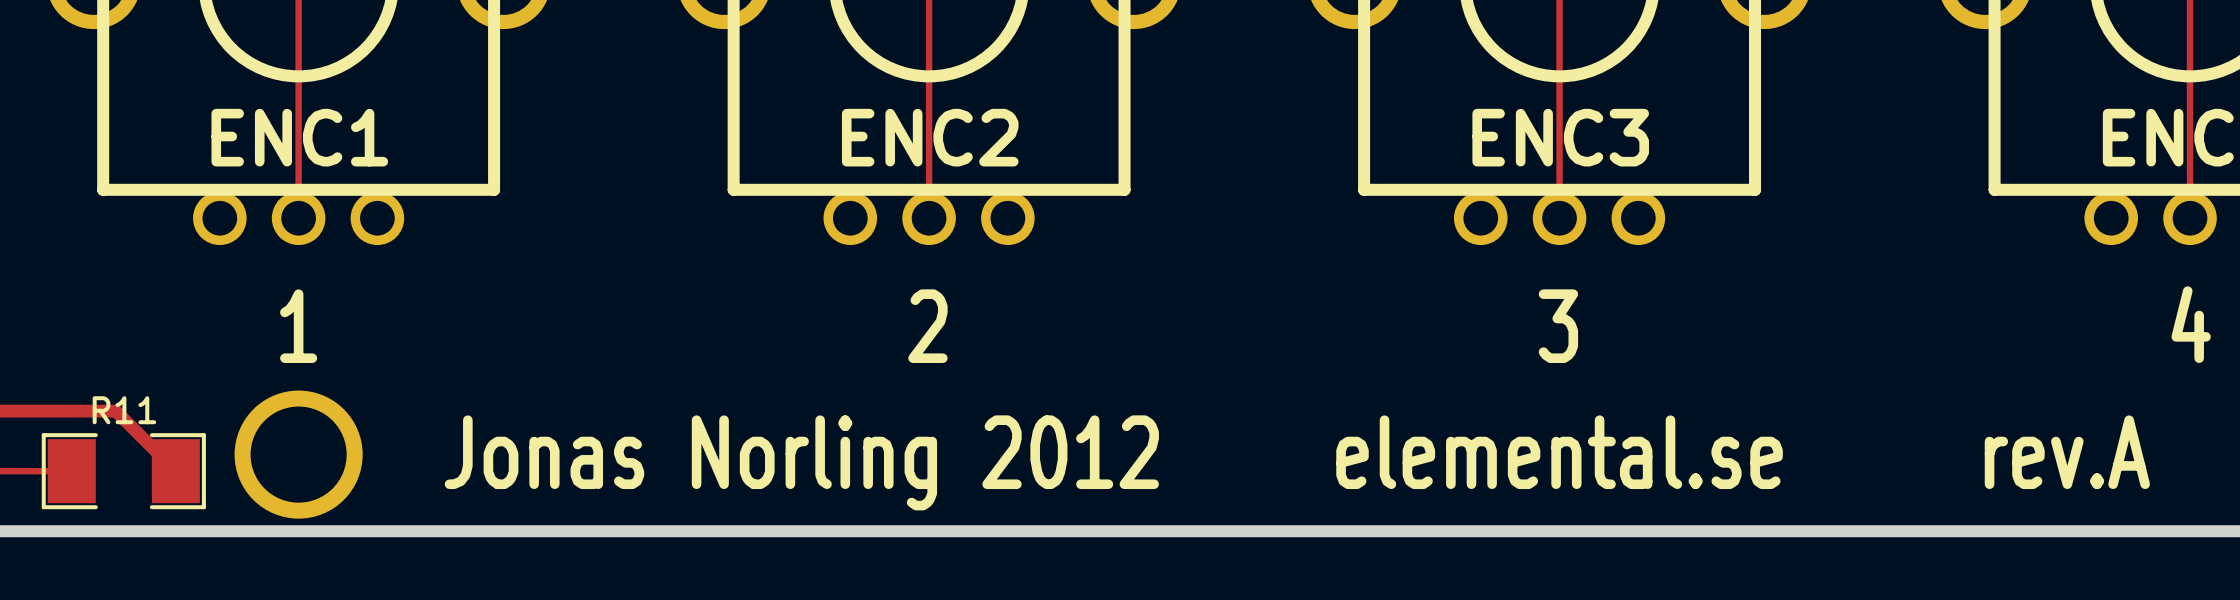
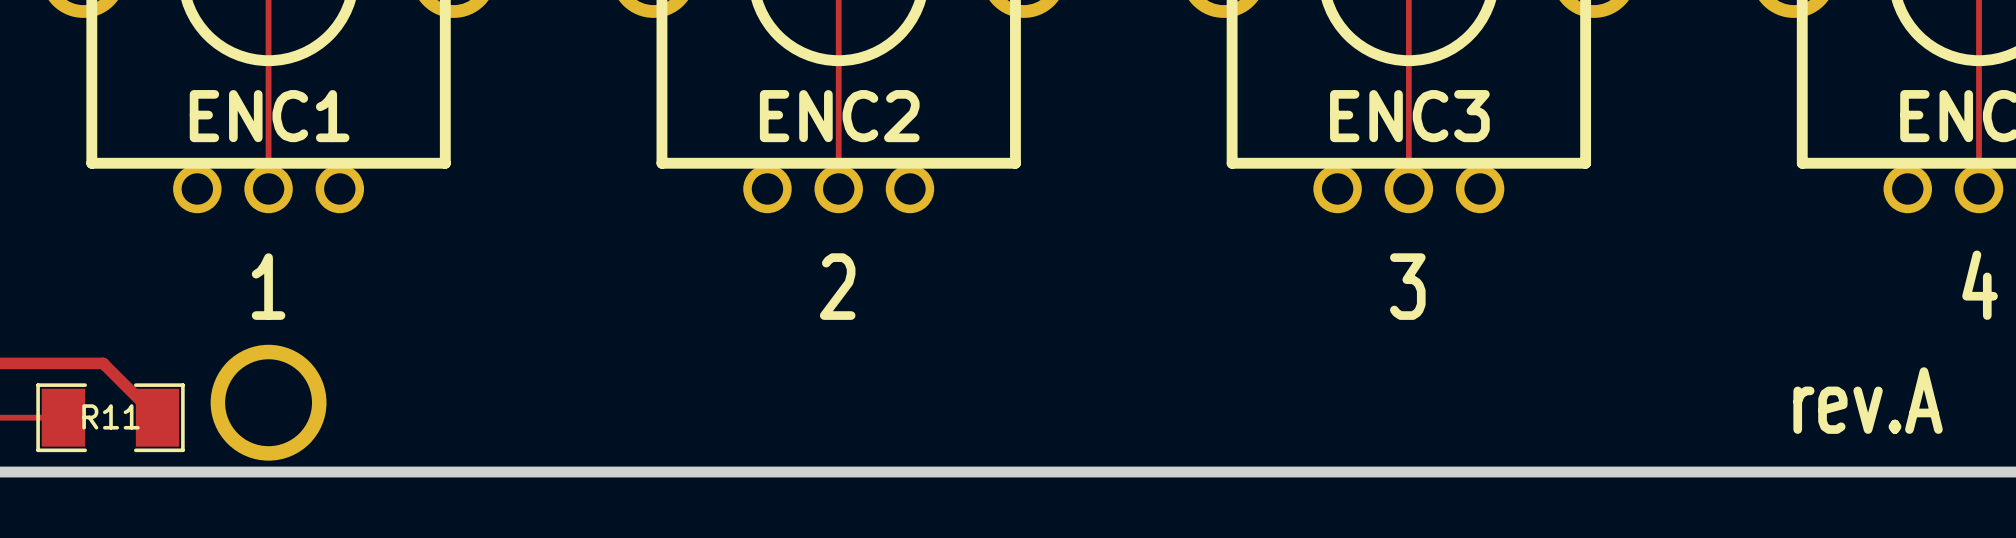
R11 name position: R11 (124, 410) -> R11 (111, 416)
text: elemental.se (1559, 452) -> none
text: Jonas Norling 2012 (801, 462) -> none

